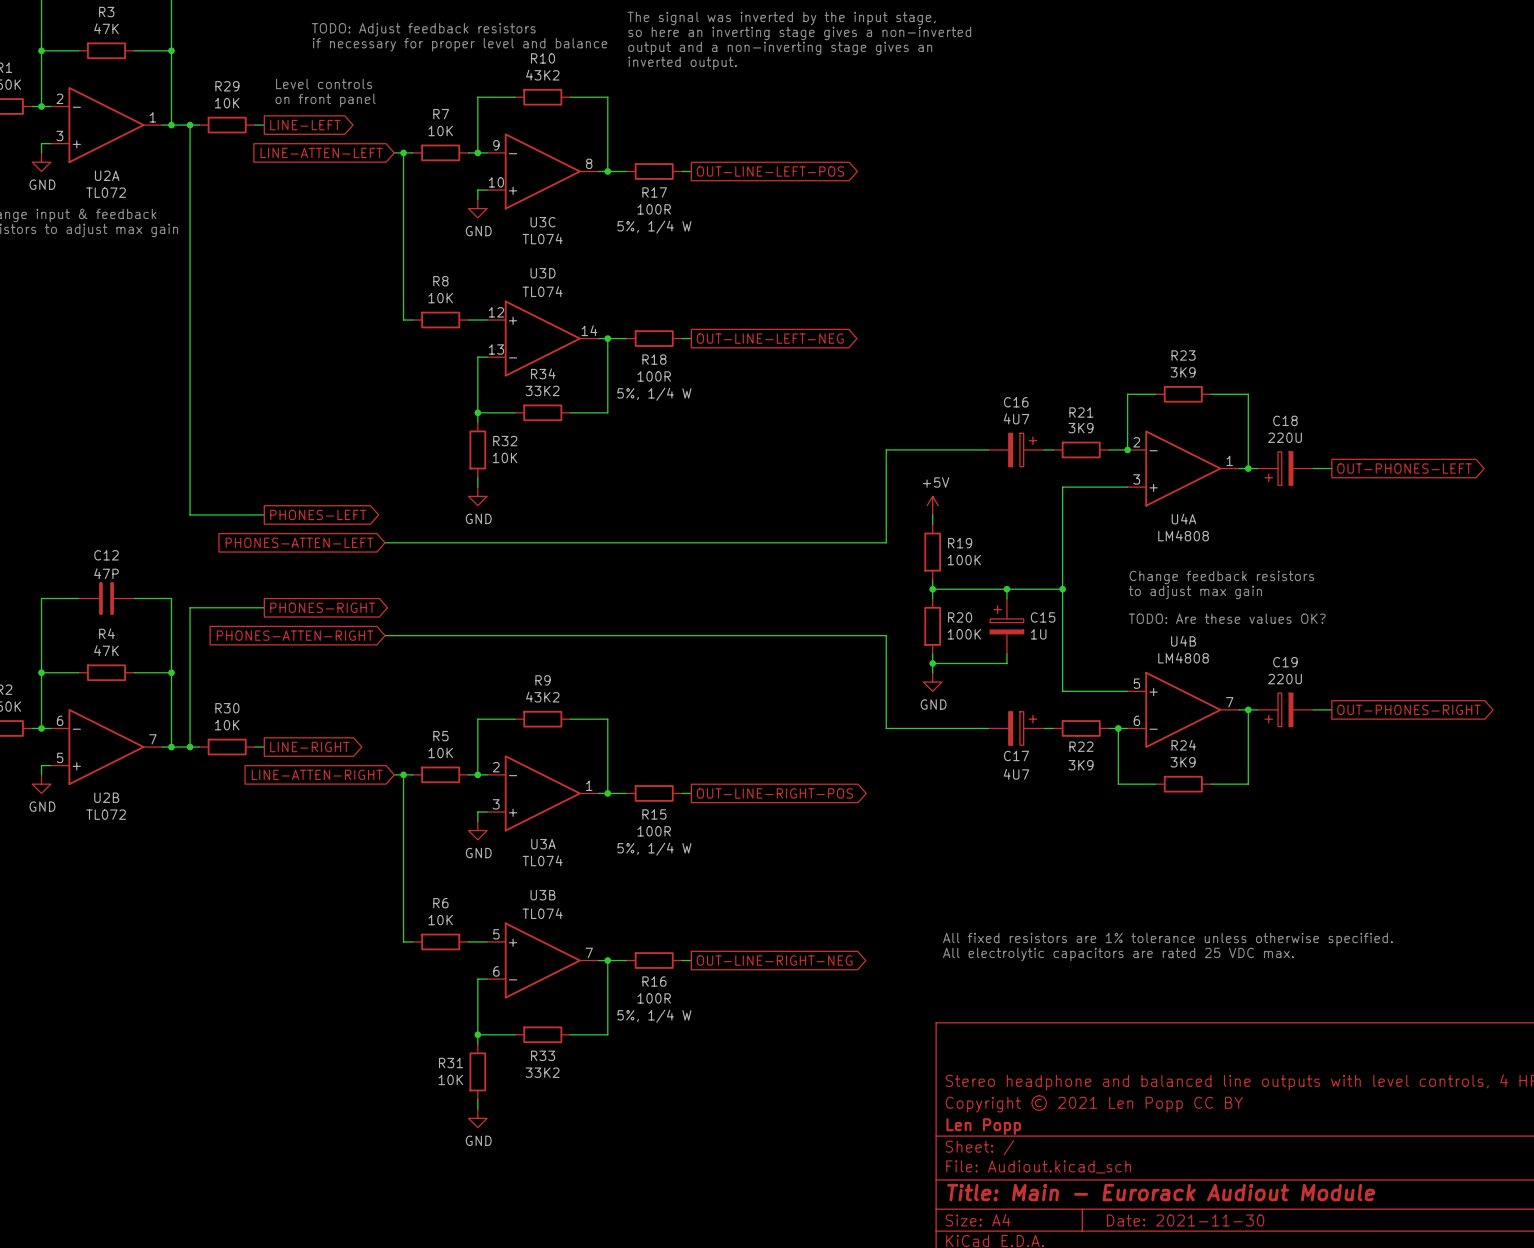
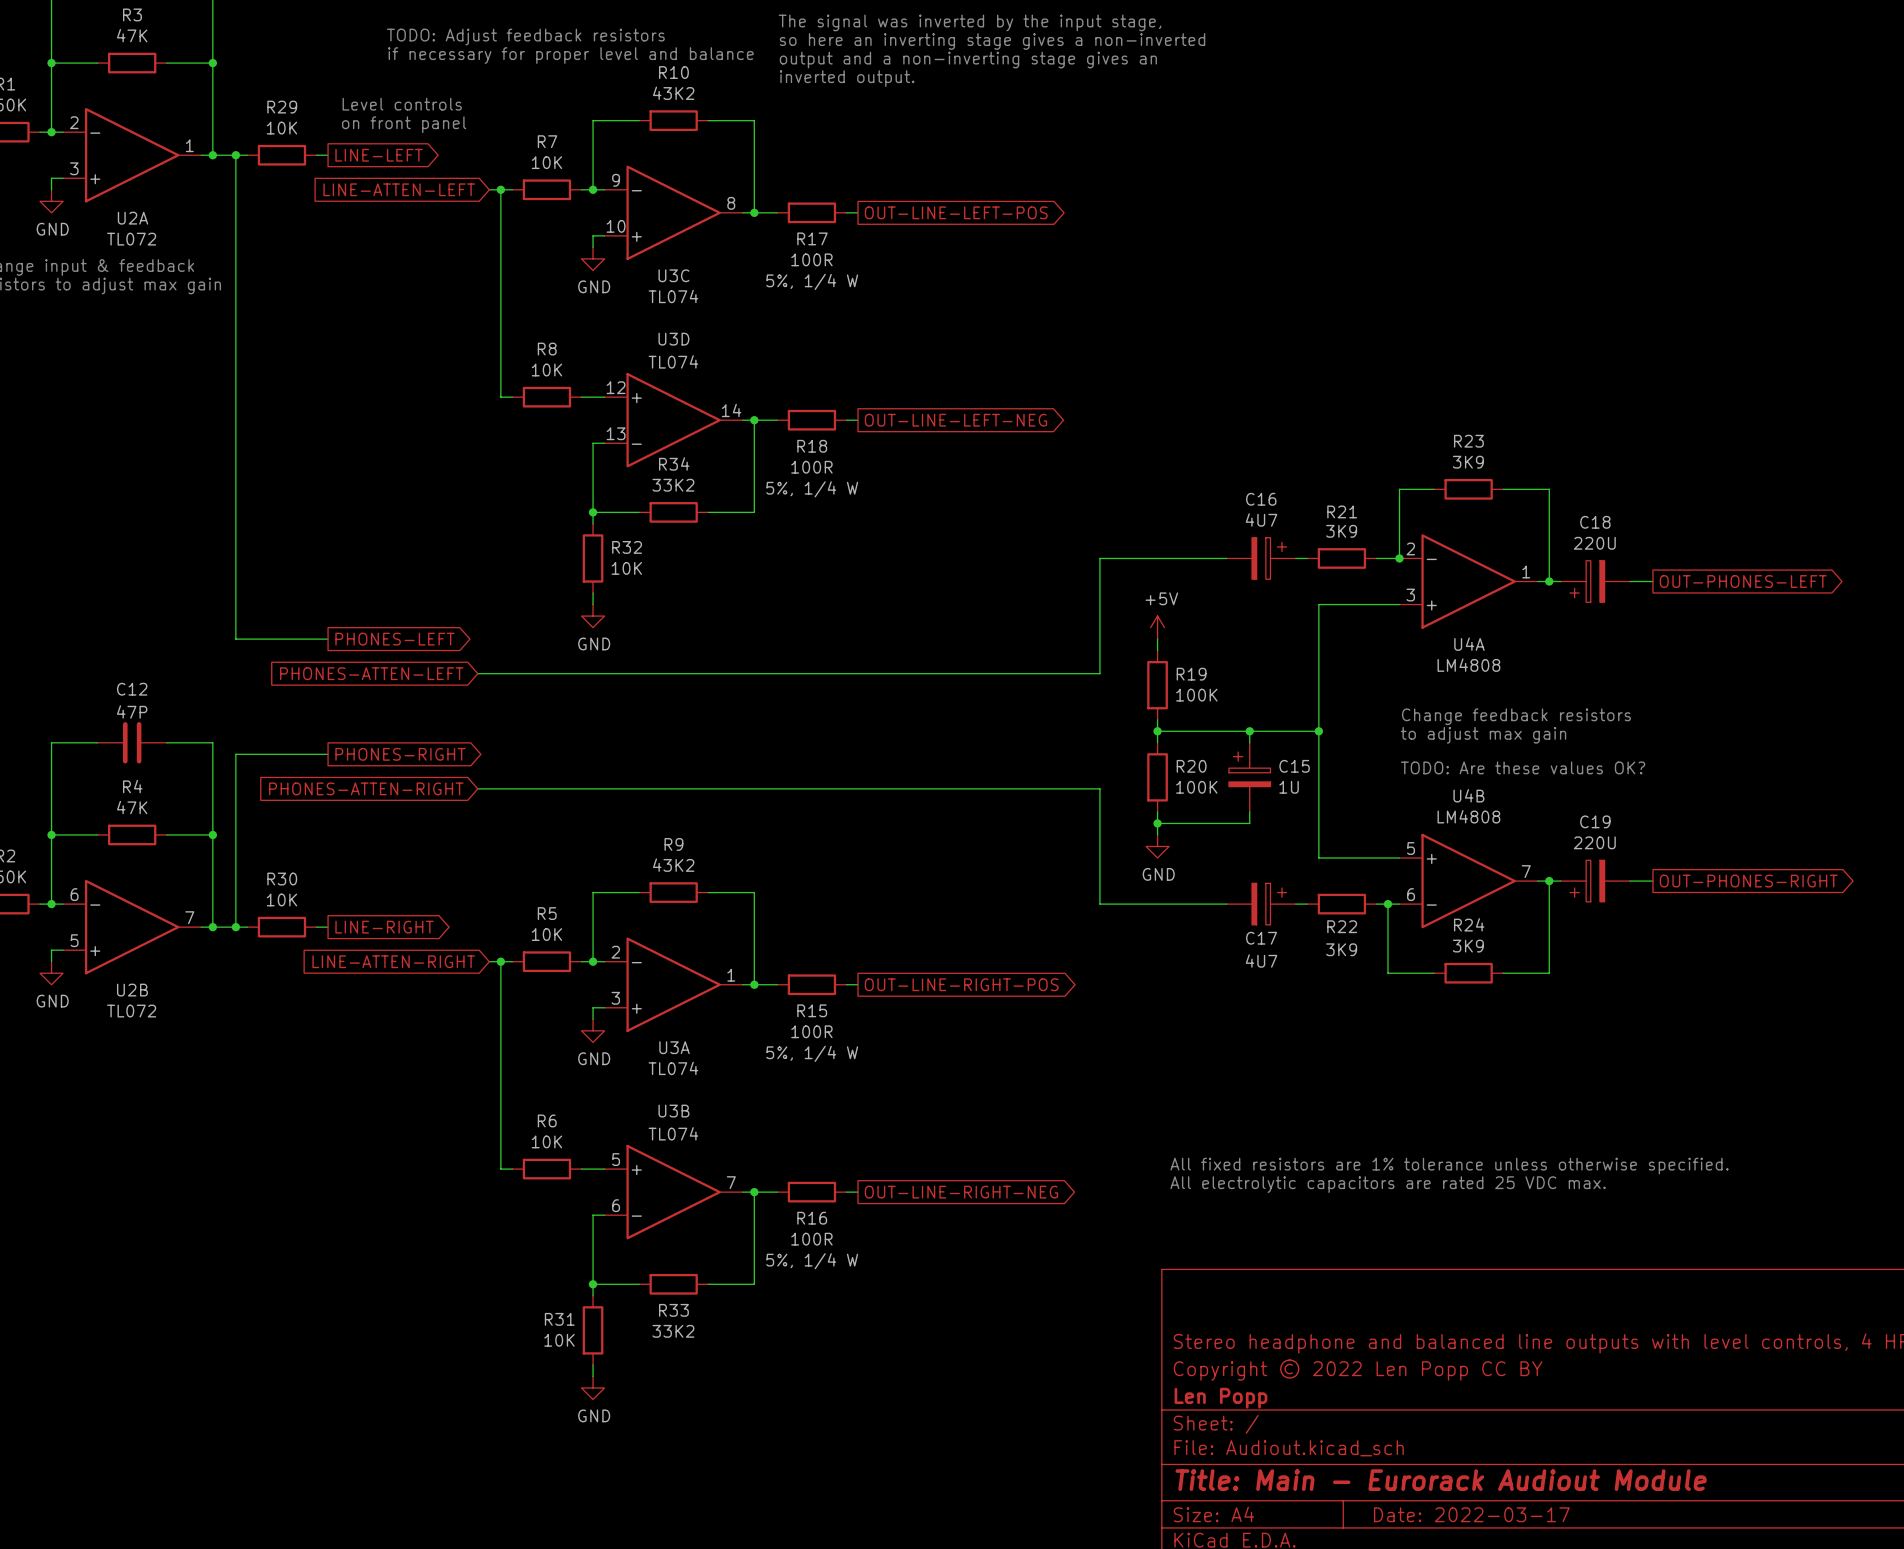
title block: Copyright © 2021 Len Popp CC BY (1094, 1103) -> Copyright © 2022 Len Popp CC BY (1358, 1369)
title block: Date: 2021-11-30 (1185, 1220) -> Date: 2022-03-17 (1471, 1514)

